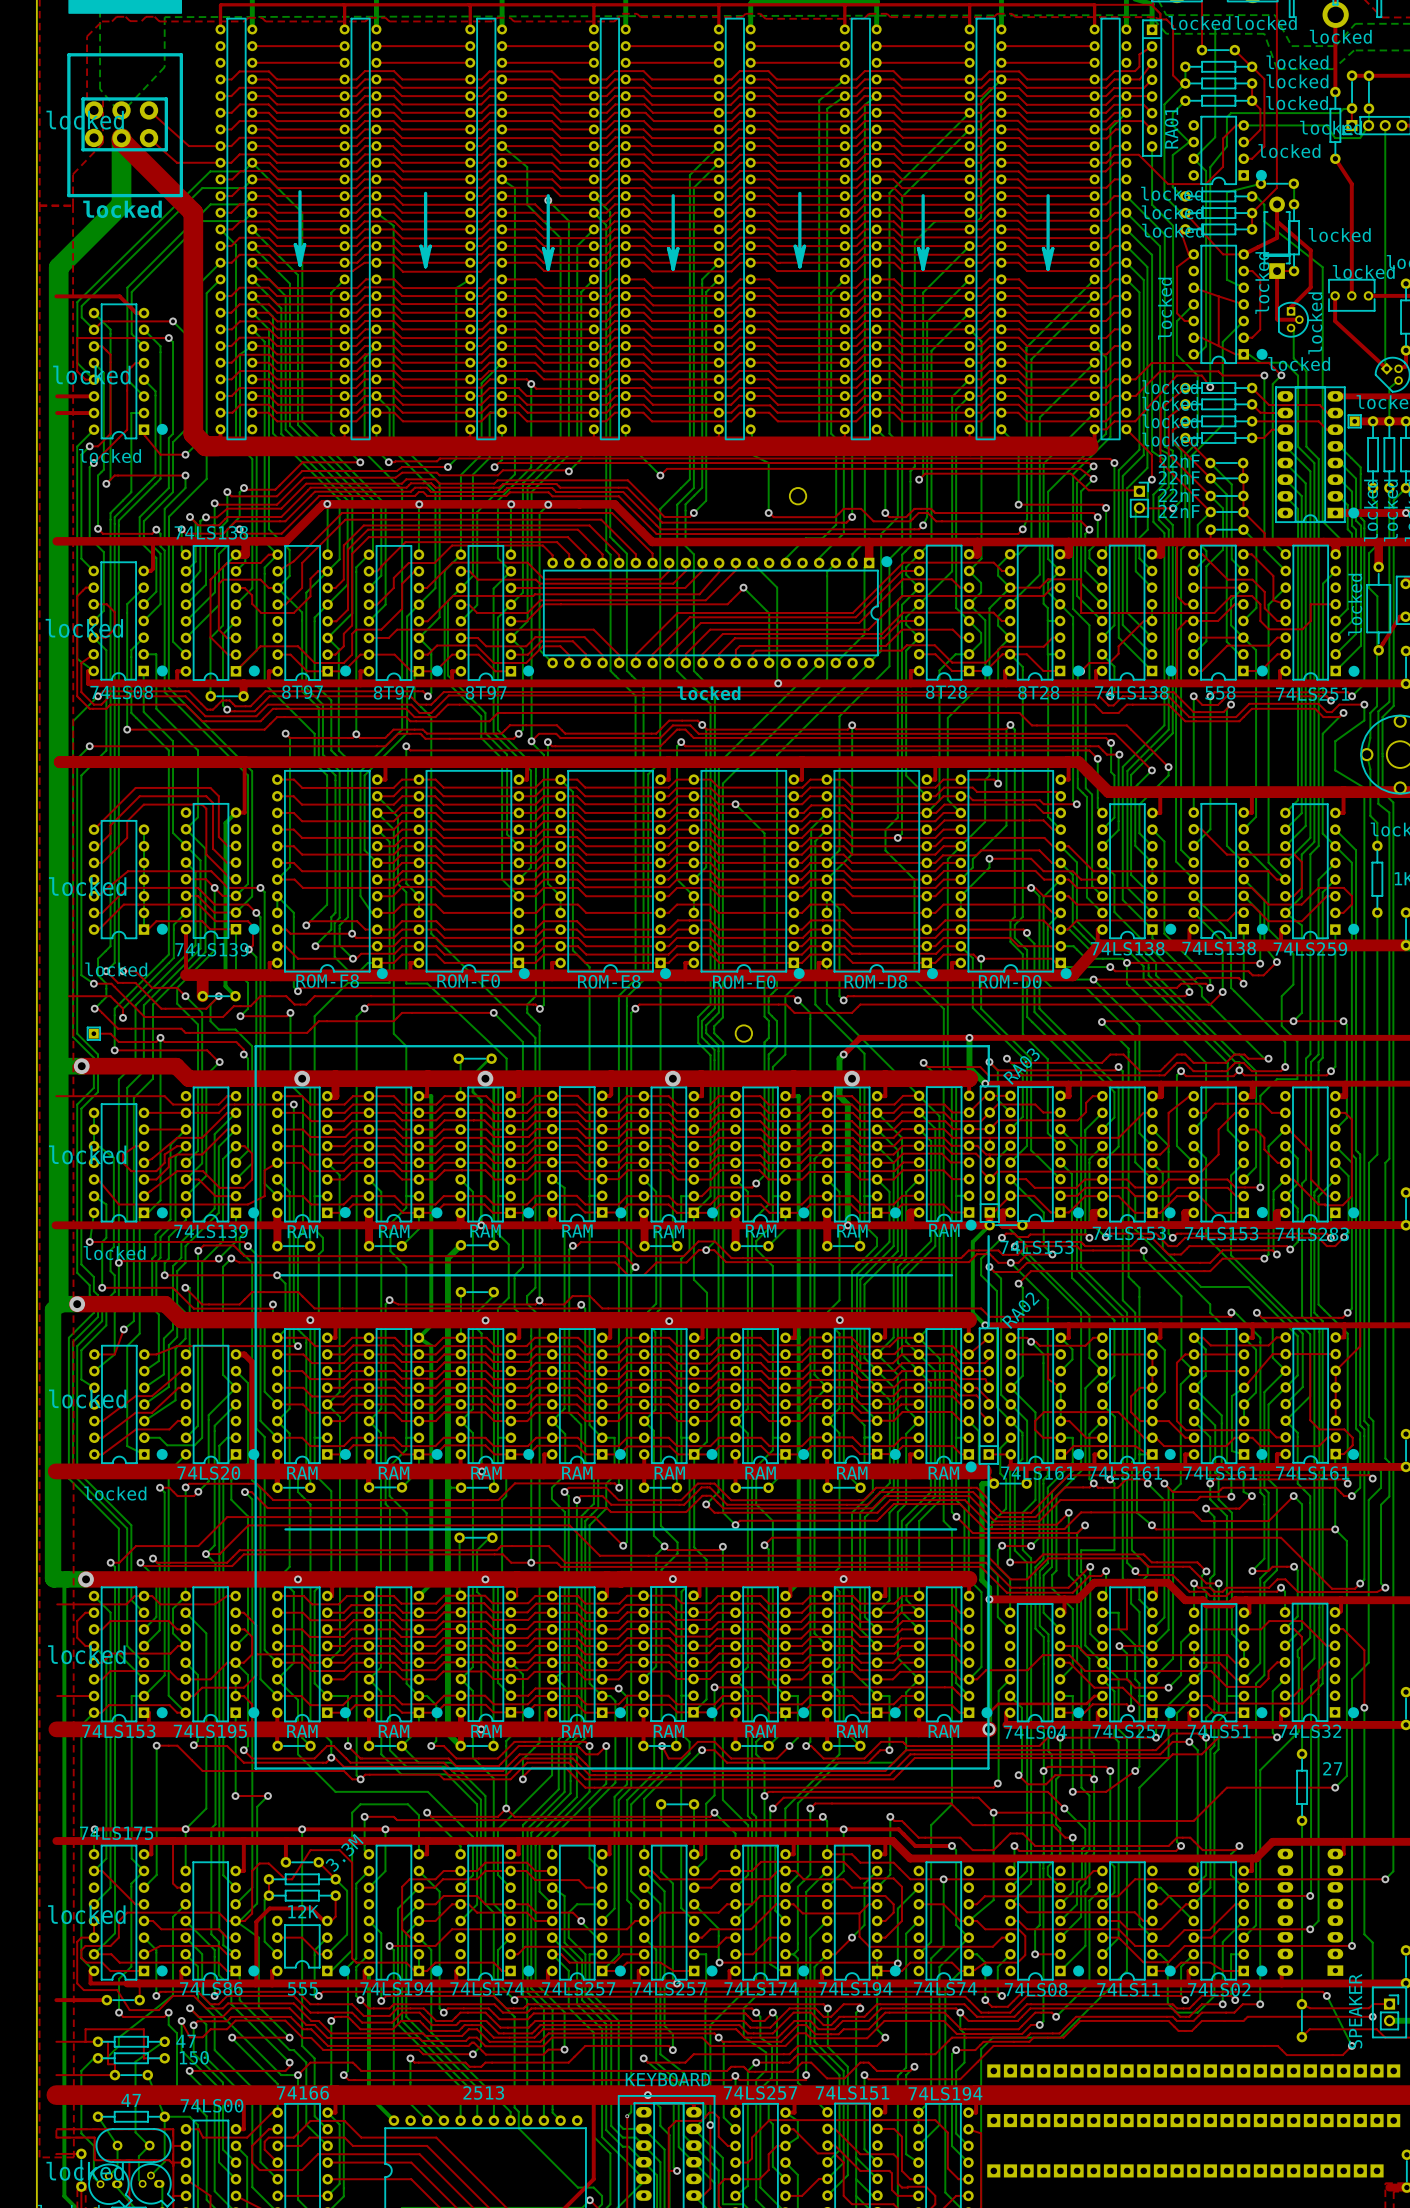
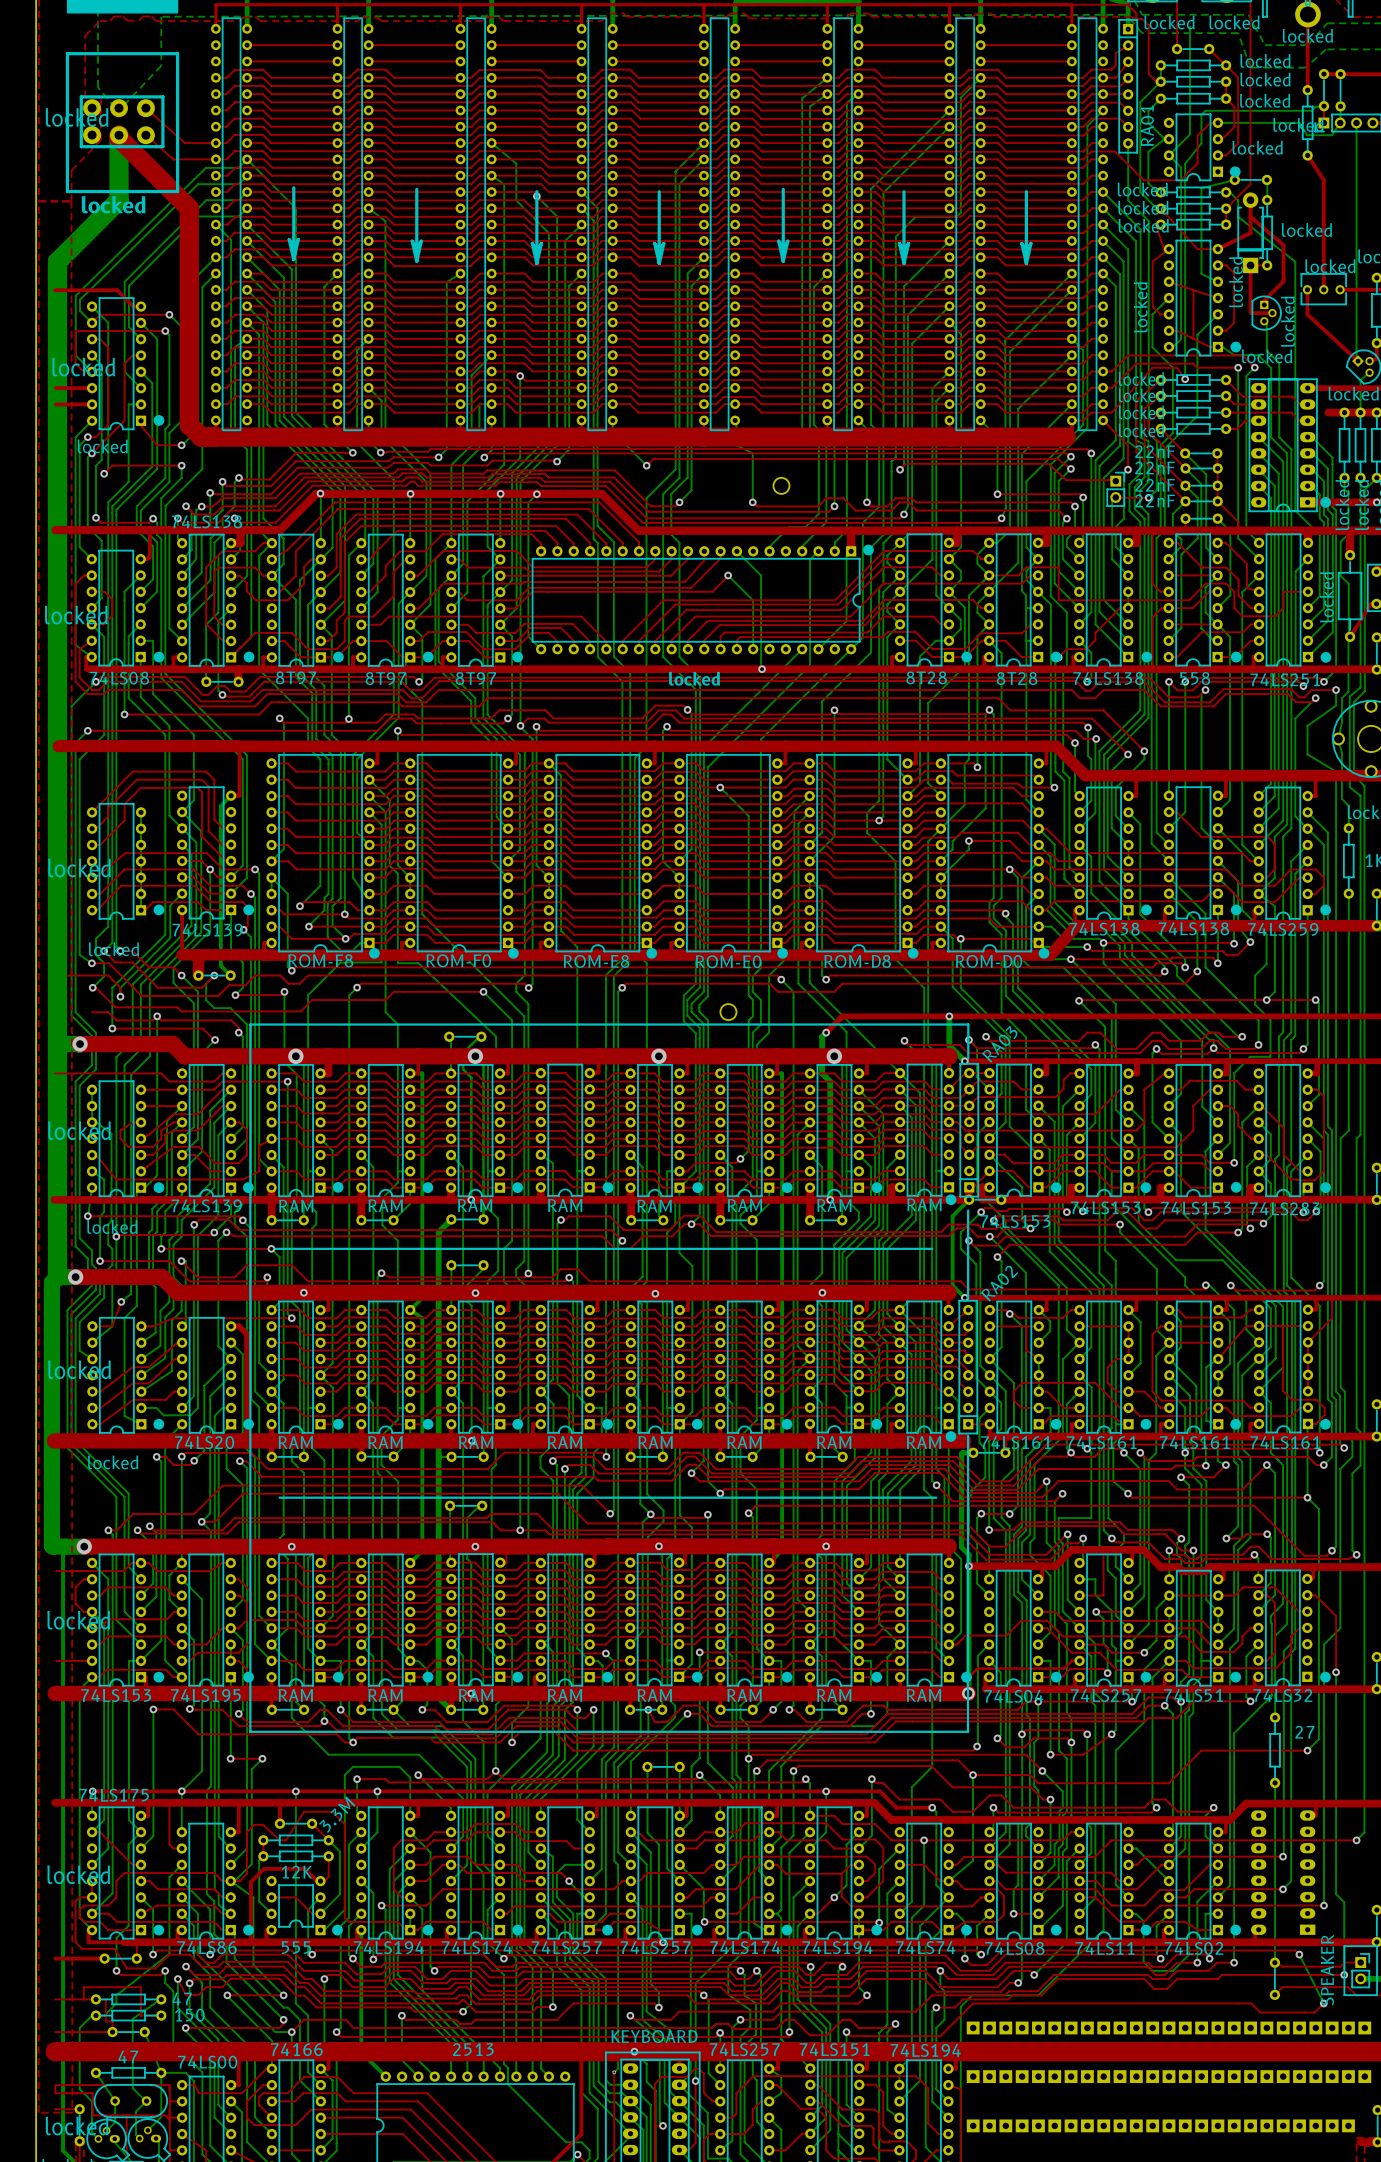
part: (1354, 421) -> none
part: (93, 1033) -> none

